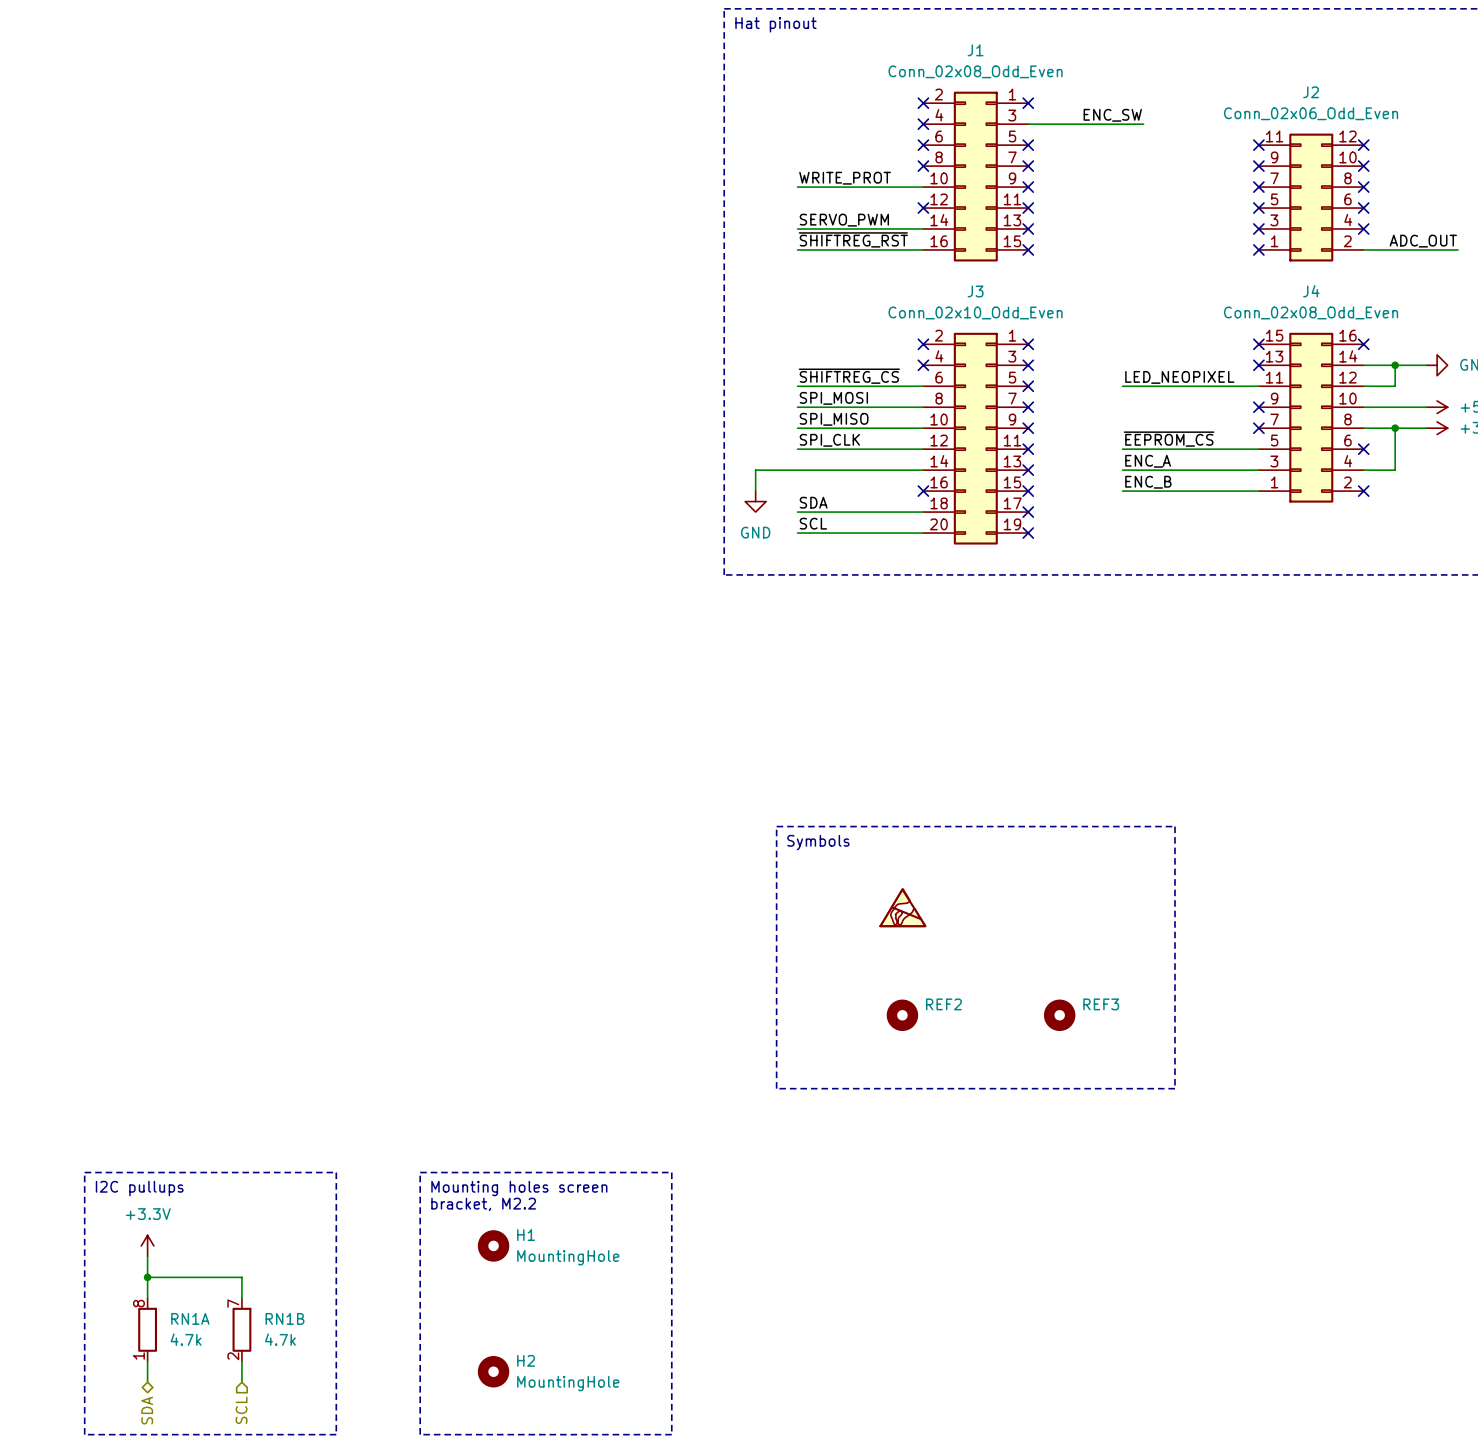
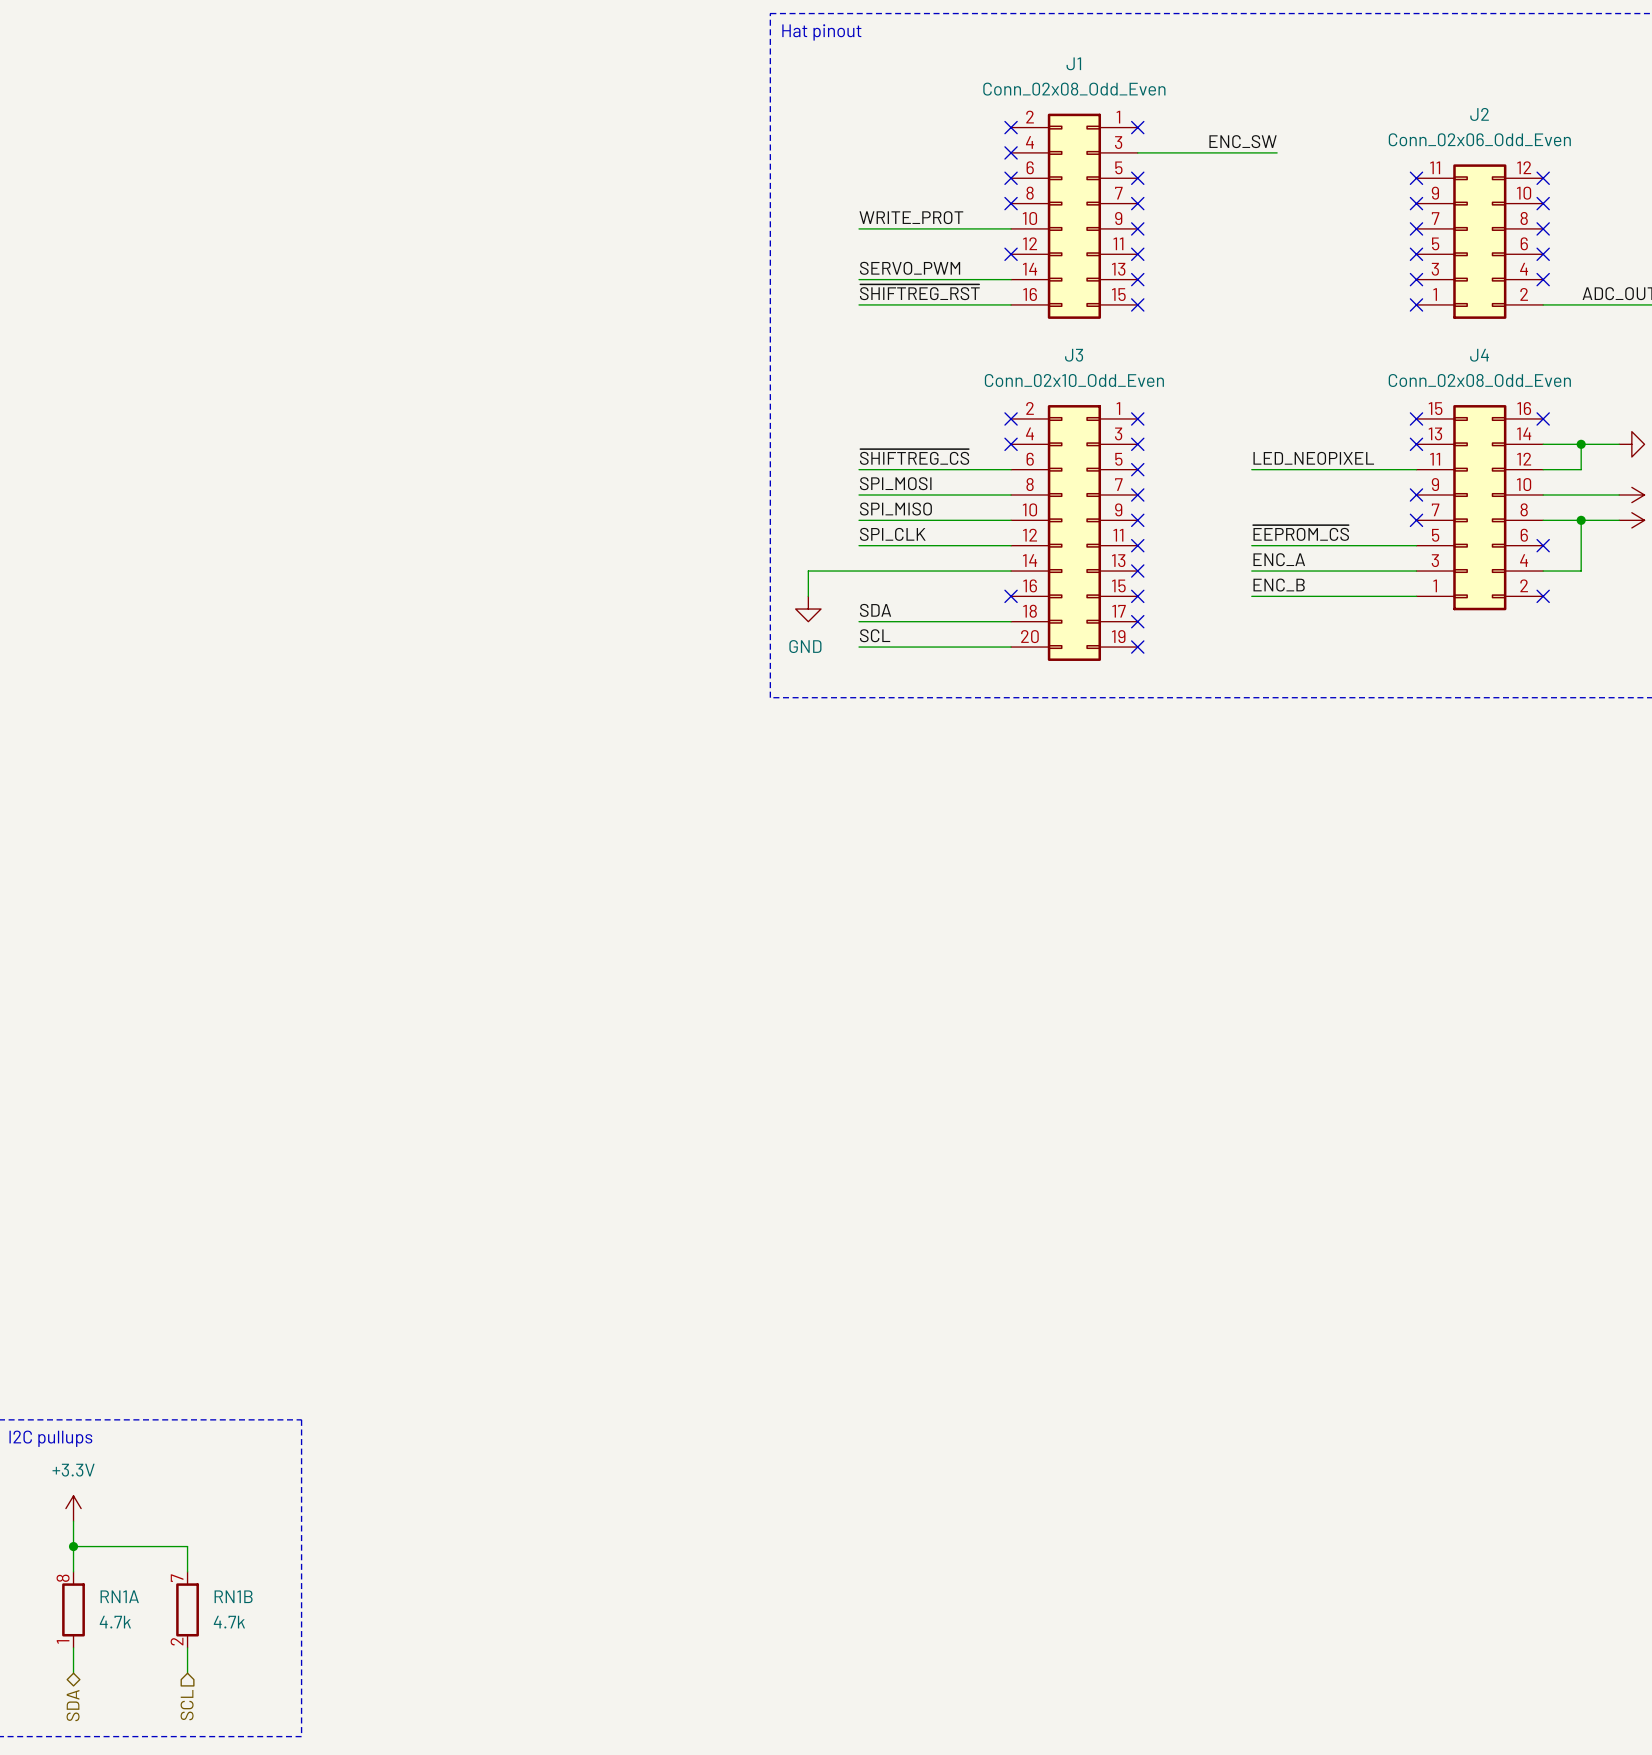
line: (776, 826) (1175, 826) (1175, 1088) (776, 1088) (776, 826) -> none
text: Symbols (818, 842) -> none
part: (902, 907) -> none
REF2: (902, 1015) -> none
REF3: (1059, 1015) -> none
line: (420, 1172) (671, 1172) (671, 1434) (420, 1434) (420, 1172) -> none
text: Mounting holes screen (519, 1188) -> none
text: bracket, M2.2 (483, 1204) -> none
H1: MountingHole (493, 1245) -> none
H2: MountingHole (493, 1371) -> none

